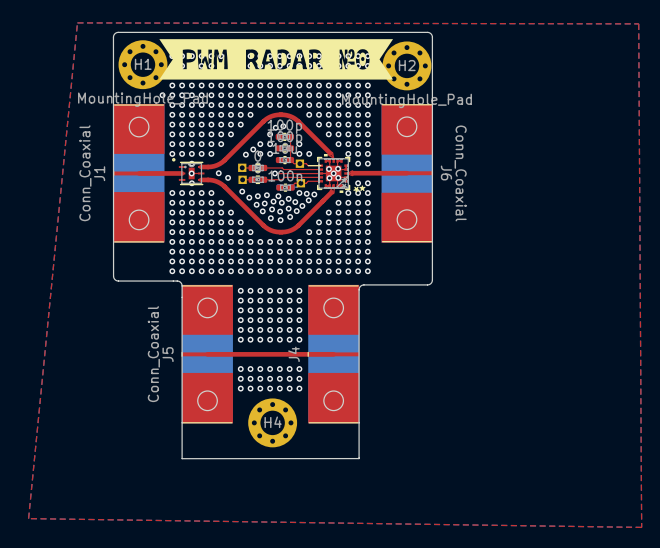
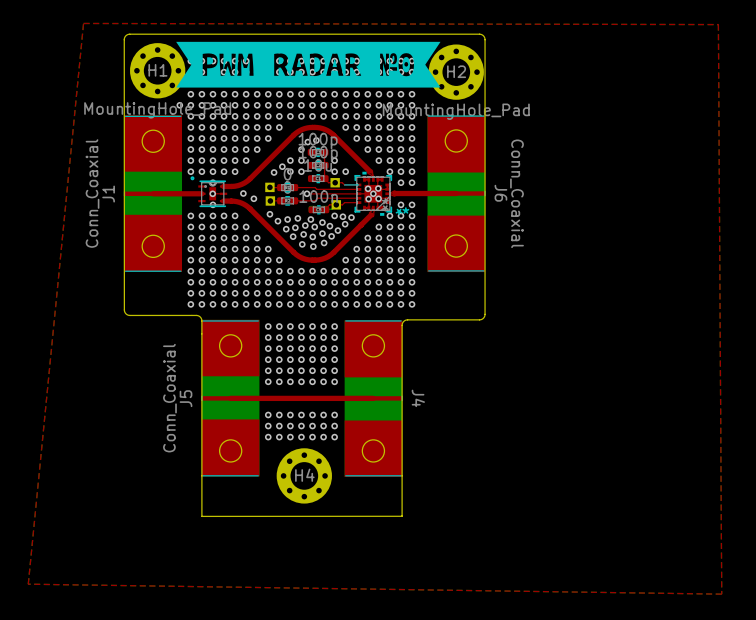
J4 rotation: 0° (333, 354) -> 180° (373, 398)

